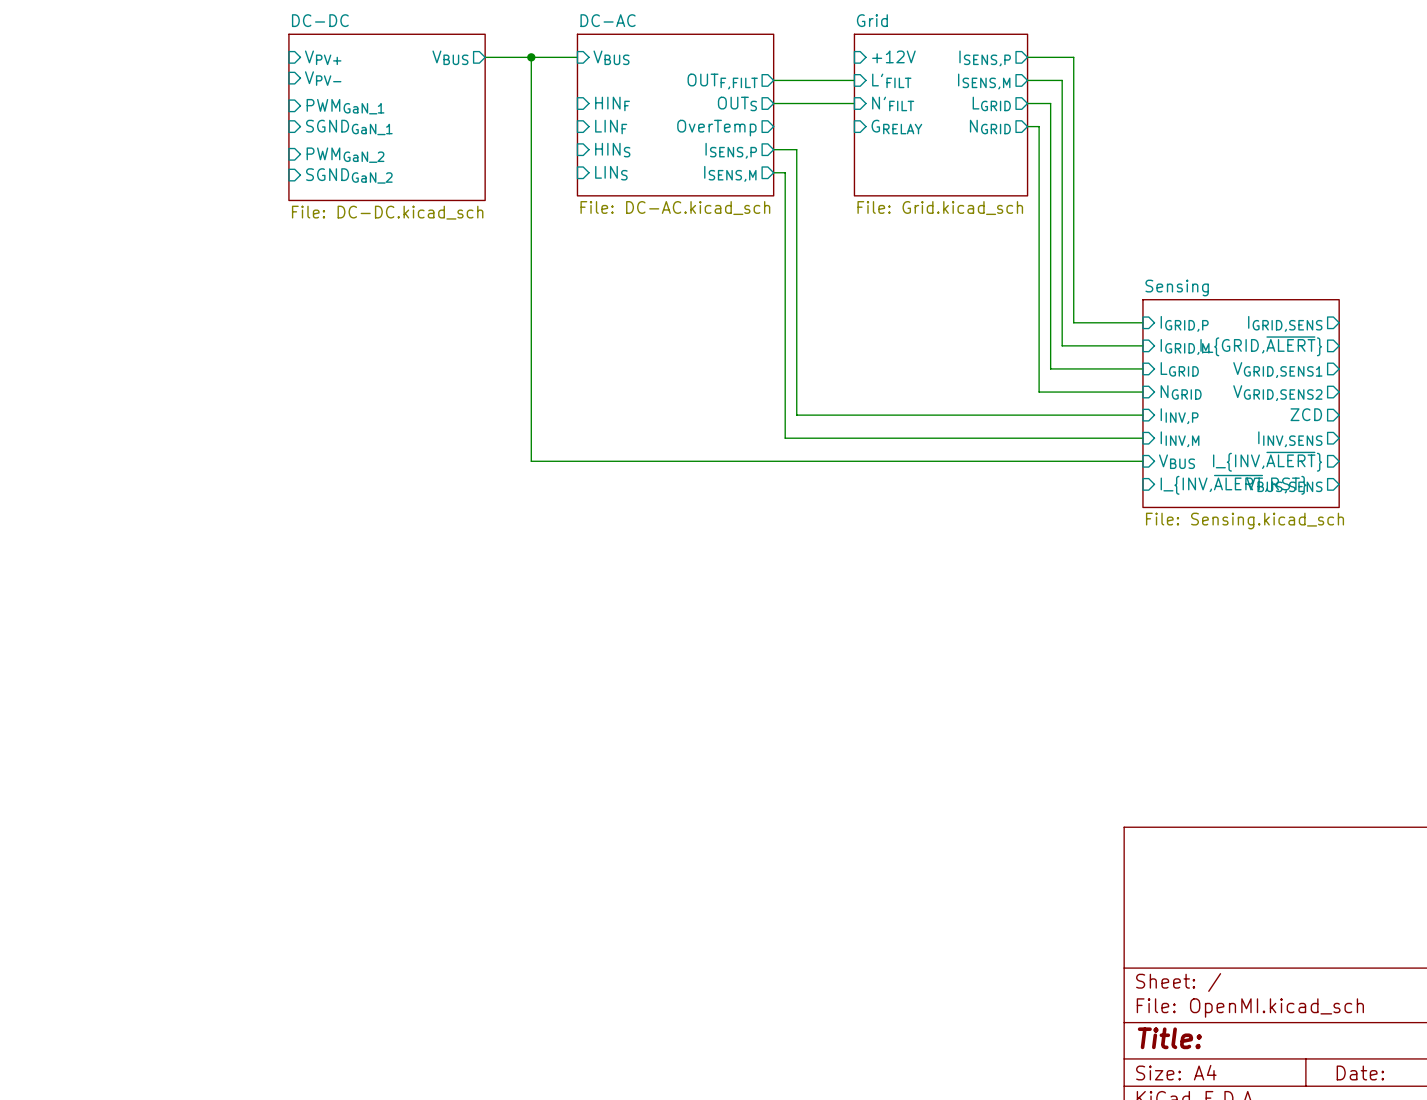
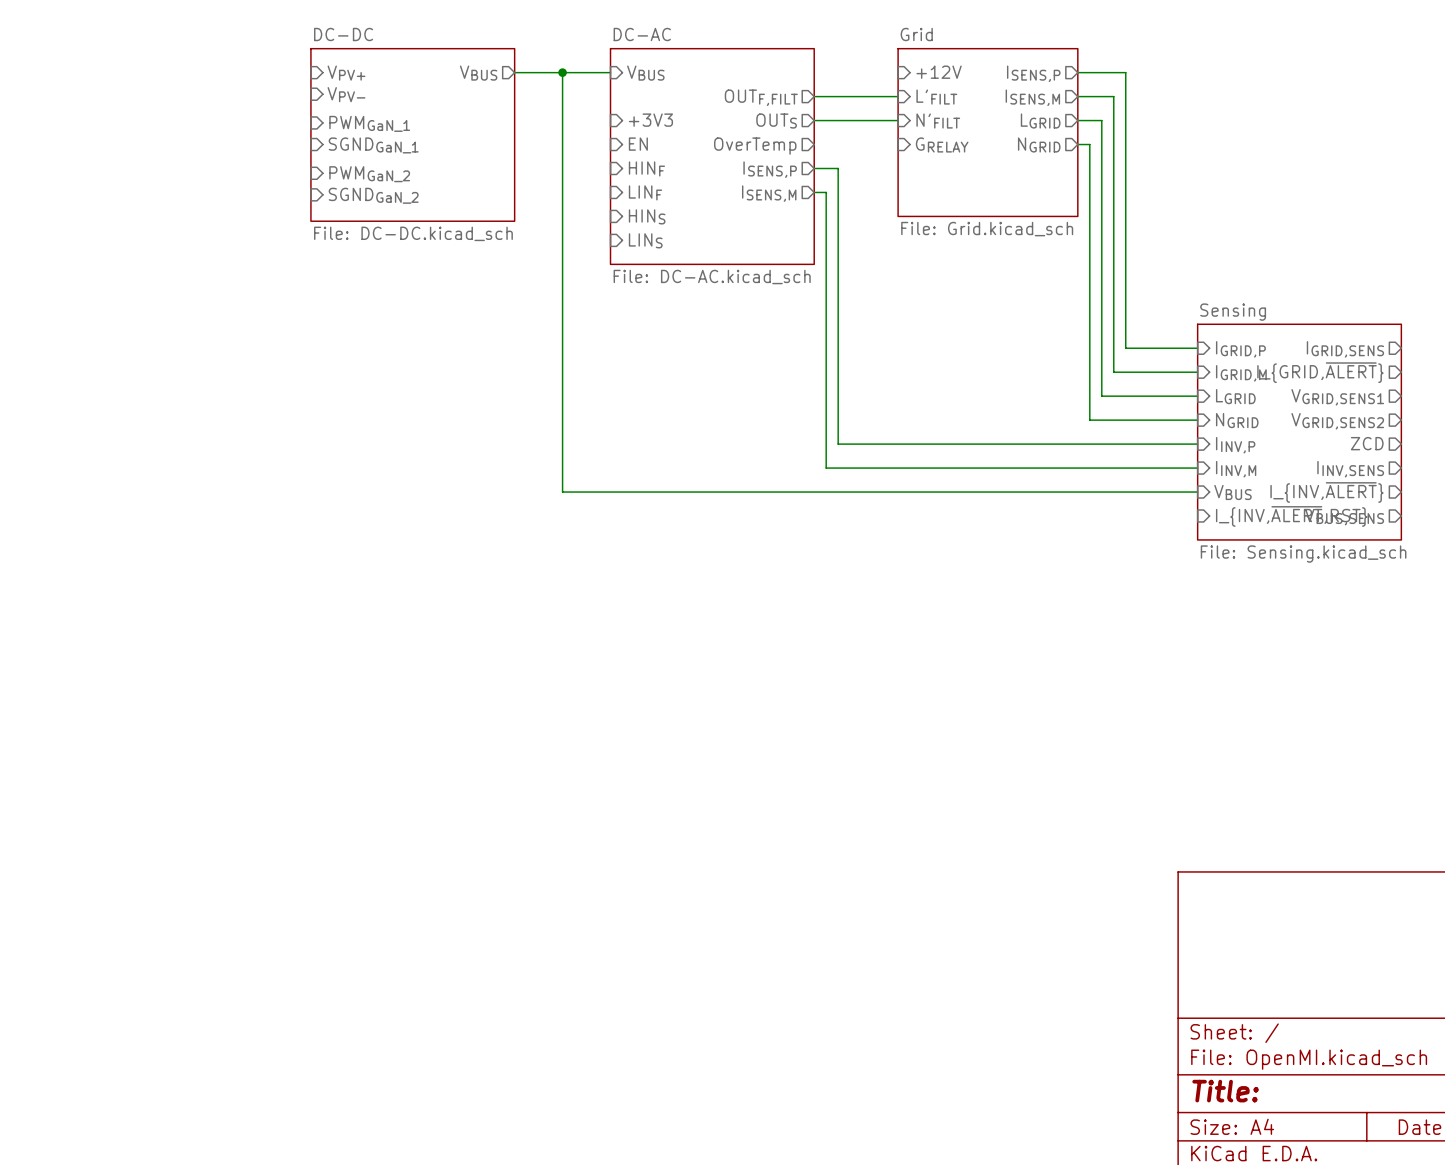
sheet pin: HINF (612, 103) -> +3V3 (650, 120)
sheet DC-AC: File: DC-AC.kicad_sch (675, 115) -> none
sheet pin: LINF (611, 127) -> EN (638, 144)
sheet DC-AC: none -> File: DC-AC.kicad_sch (712, 156)
sheet pin: HINS (612, 150) -> HINF (646, 168)
sheet pin: LINS (611, 173) -> LINF (645, 192)
sheet pin: none -> HINS (647, 216)
sheet pin: none -> LINS (645, 240)

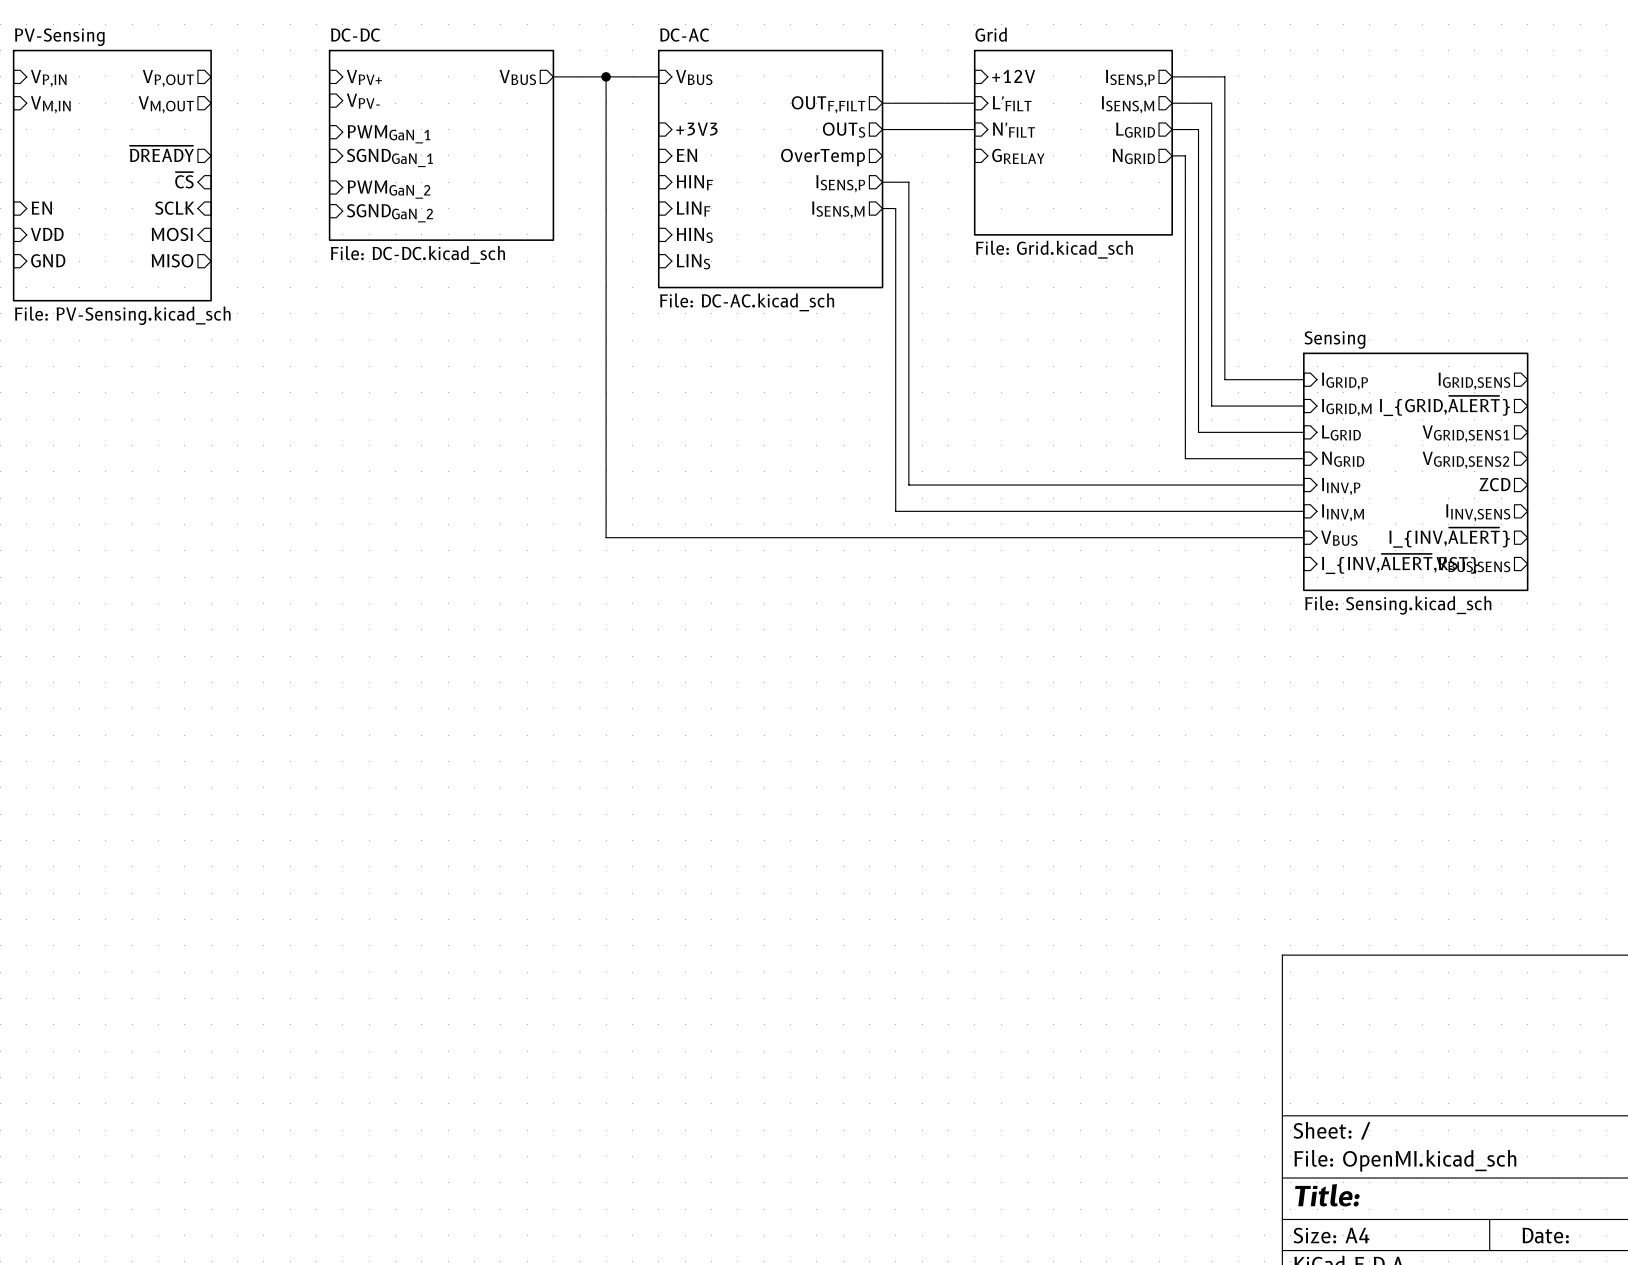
sheet pin: none -> VP,IN (48, 78)
sheet pin: none -> VP,OUT (168, 78)
sheet pin: none -> VM,IN (50, 104)
sheet pin: none -> VM,OUT (166, 104)
sheet pin: none -> ~{DREADY} (161, 153)
sheet PV-Sensing: none -> File: PV-Sensing.kicad_sch (112, 175)
sheet pin: none -> ~{CS} (184, 180)
sheet pin: none -> EN (41, 208)
sheet pin: none -> SCLK (174, 208)
sheet pin: none -> VDD (47, 234)
sheet pin: none -> MOSI (172, 234)
sheet pin: none -> GND (48, 260)
sheet pin: none -> MISO (172, 260)

